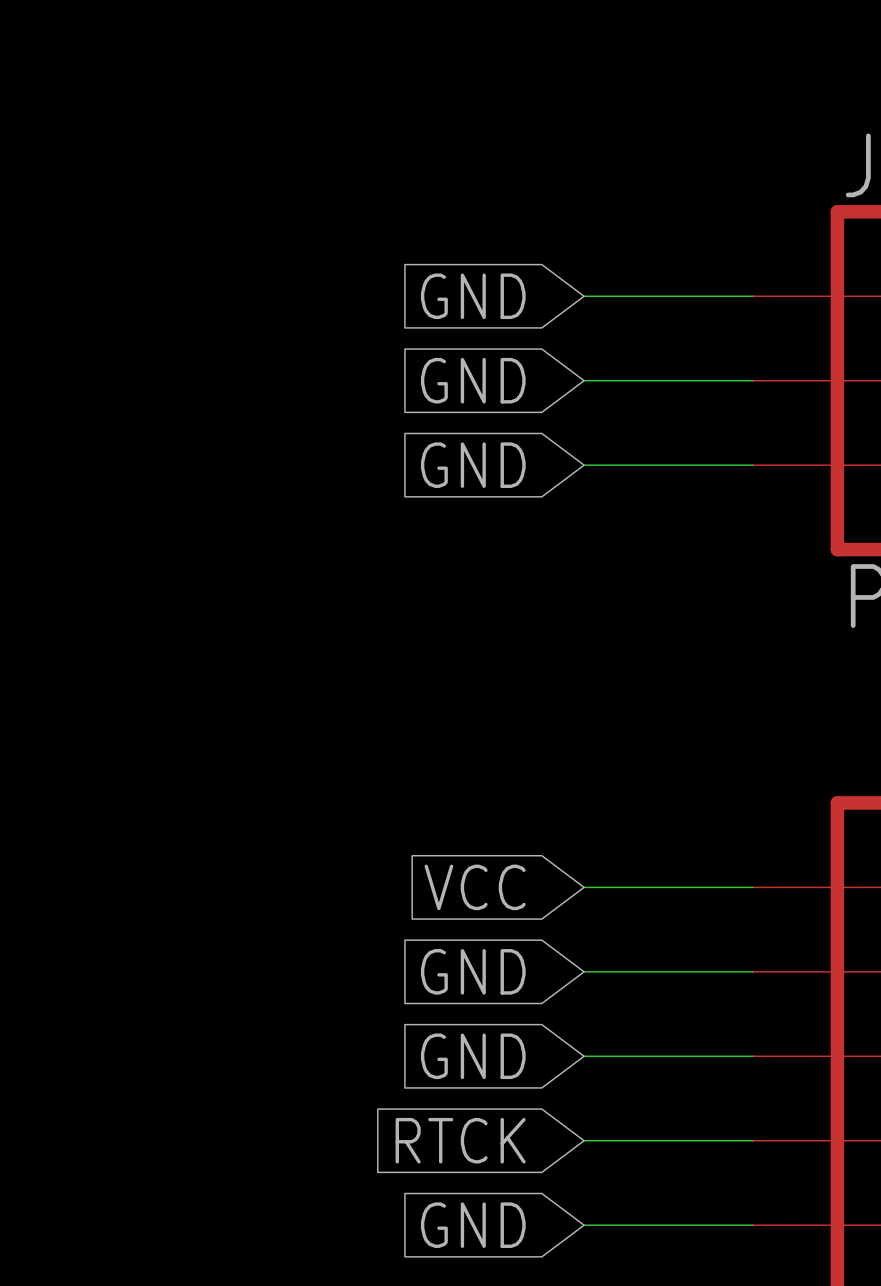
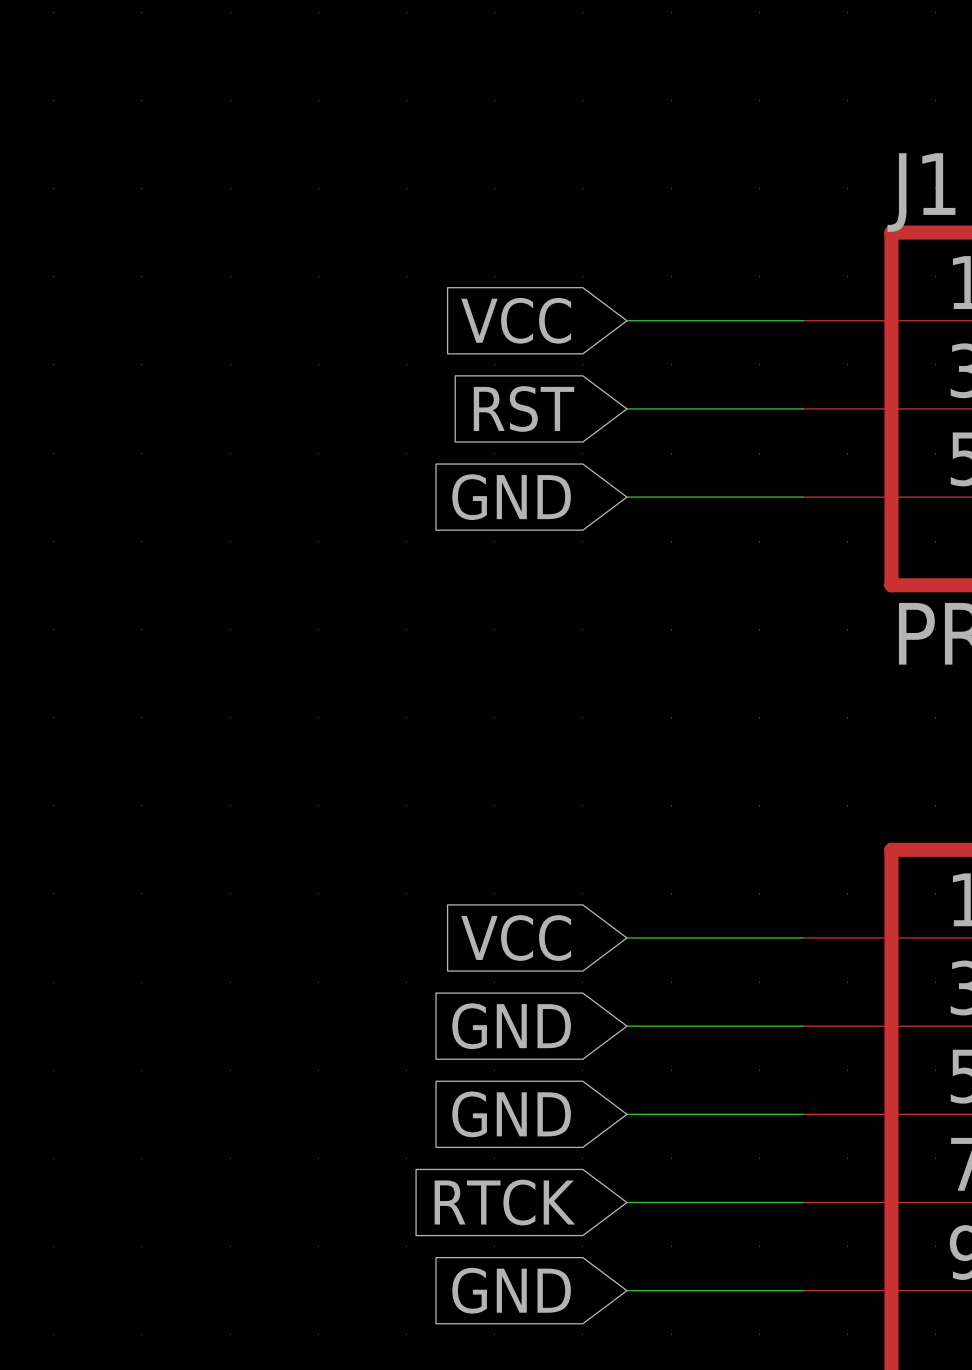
global label: GND (473, 296) -> VCC (516, 320)
global label: GND (473, 380) -> RST (523, 408)

